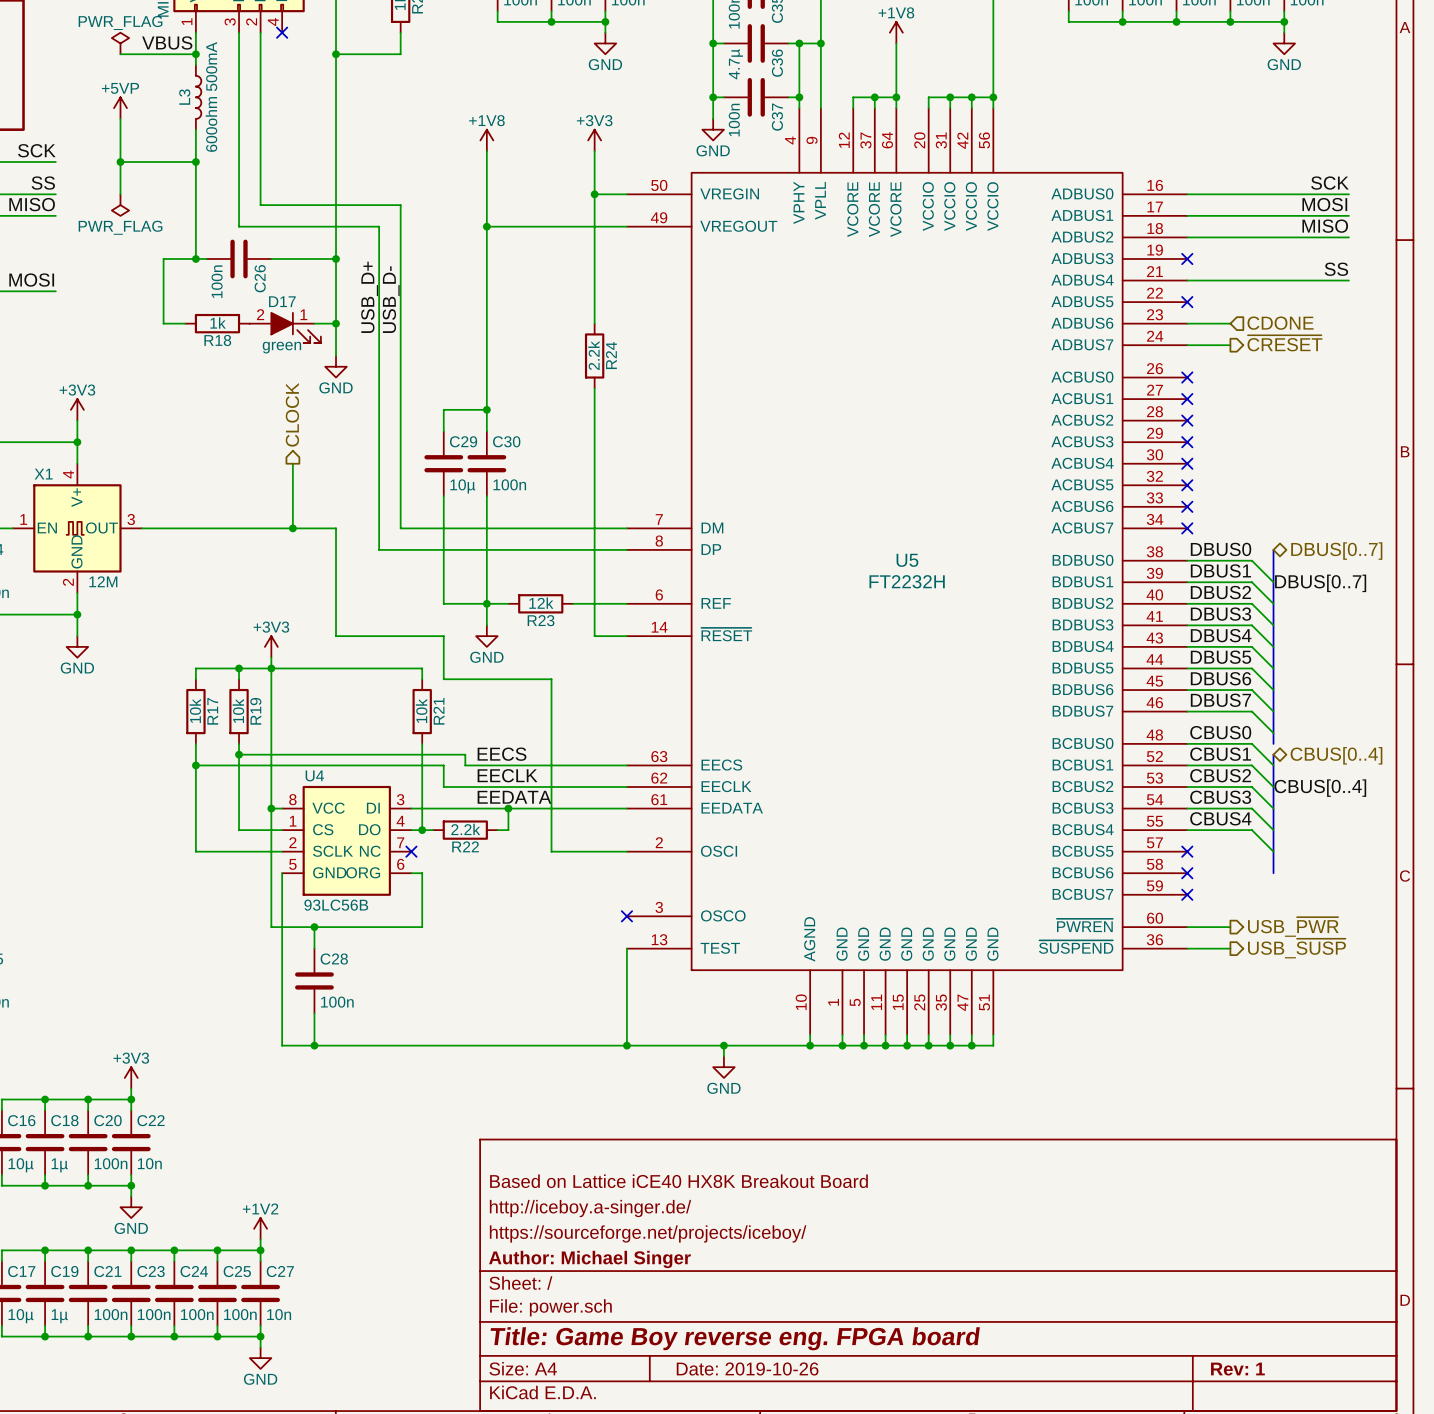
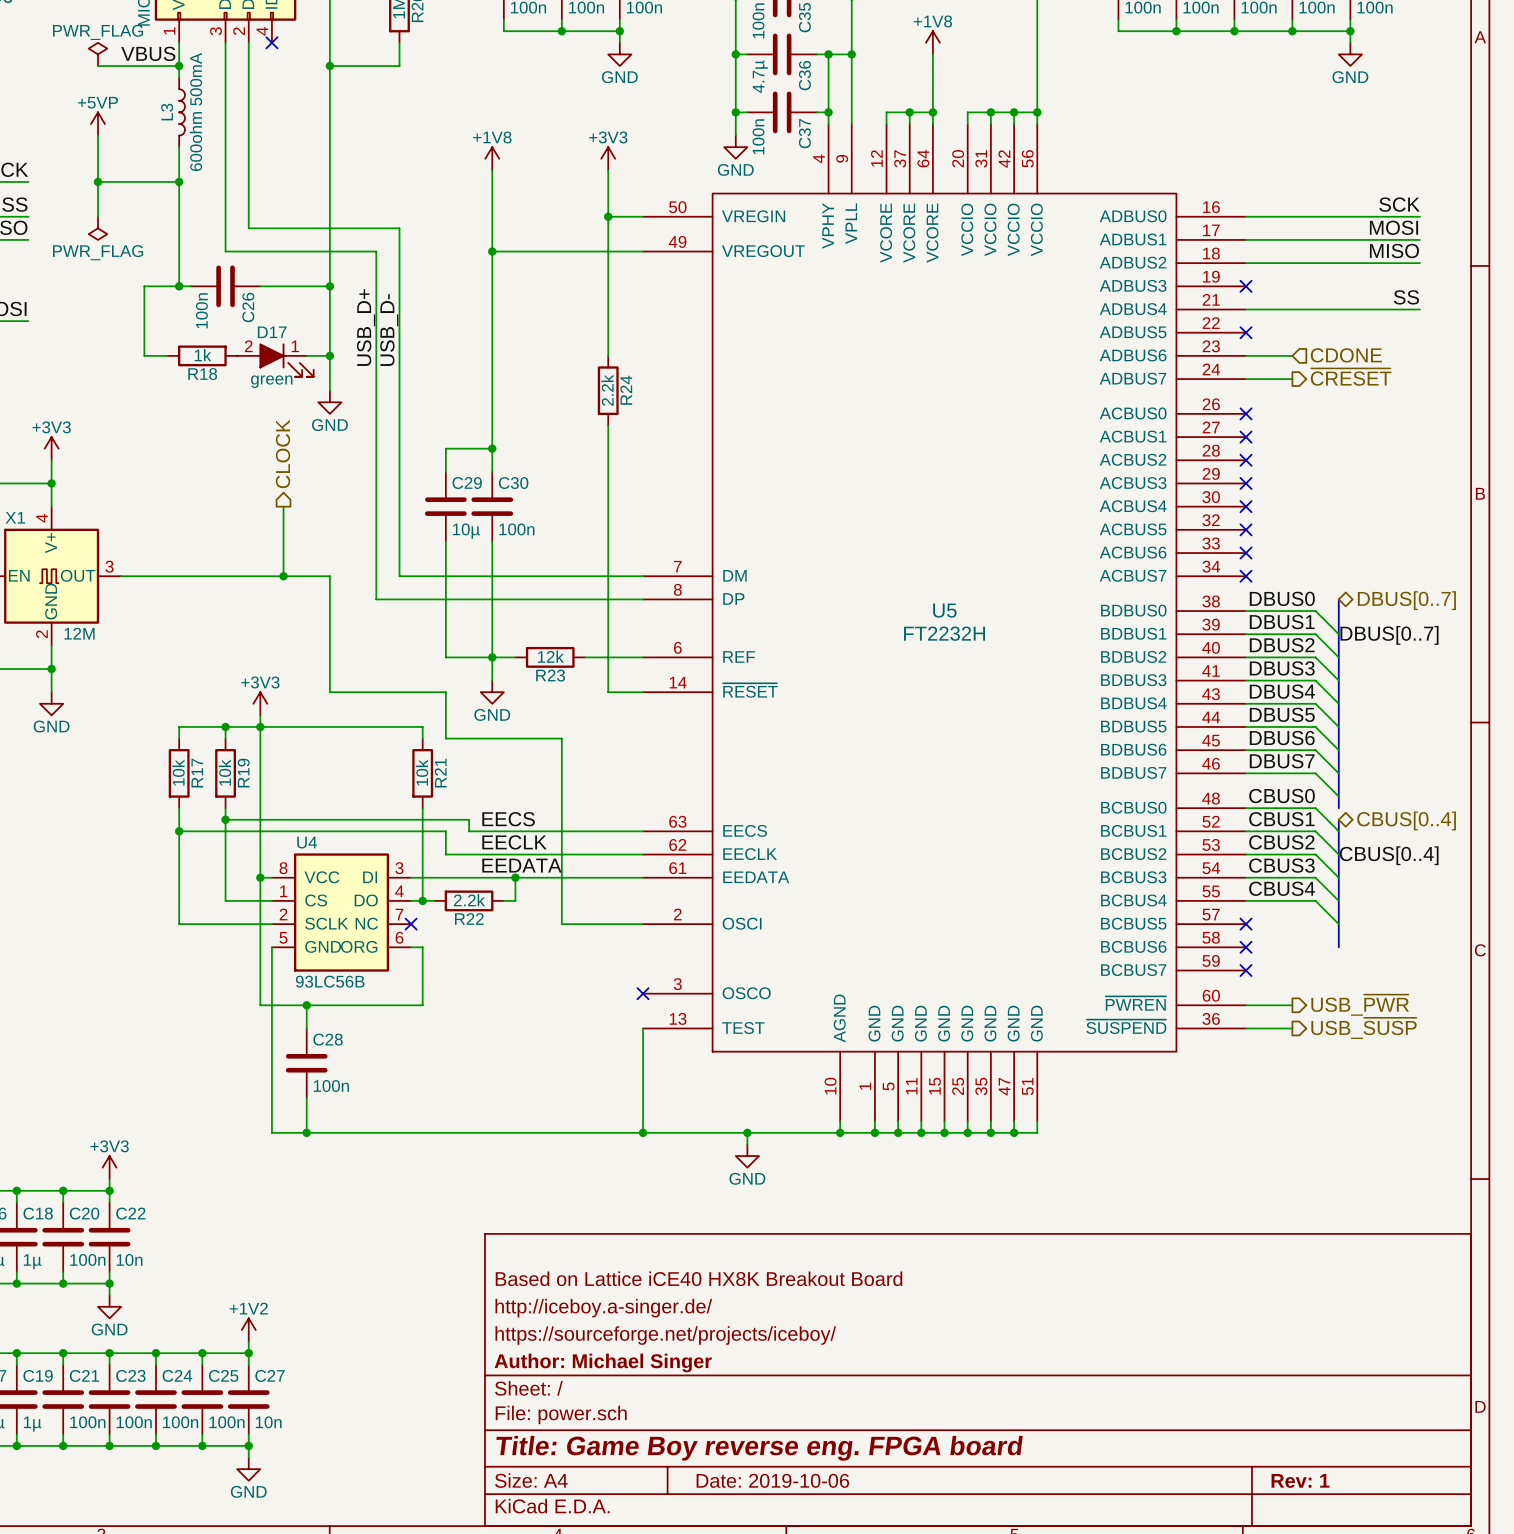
title block: Date: 2019-10-26 (747, 1368) -> Date: 2019-10-06 (772, 1480)

